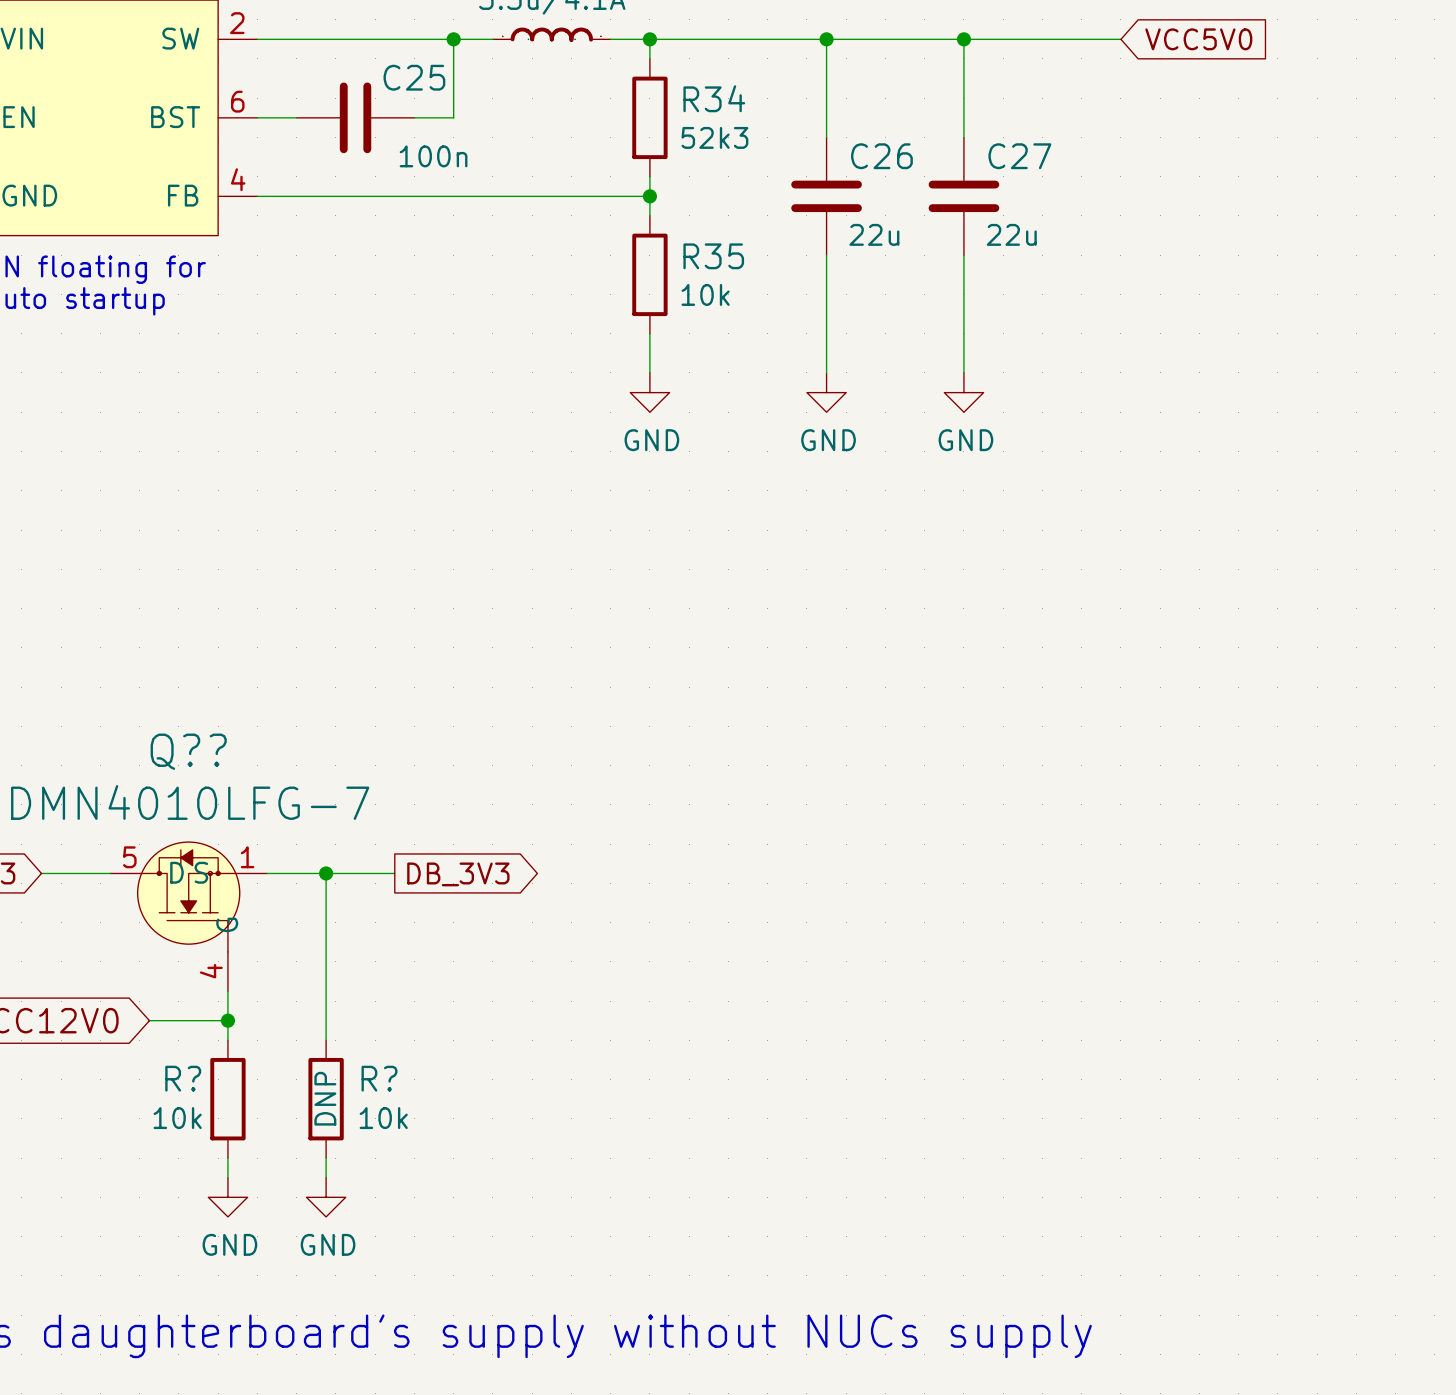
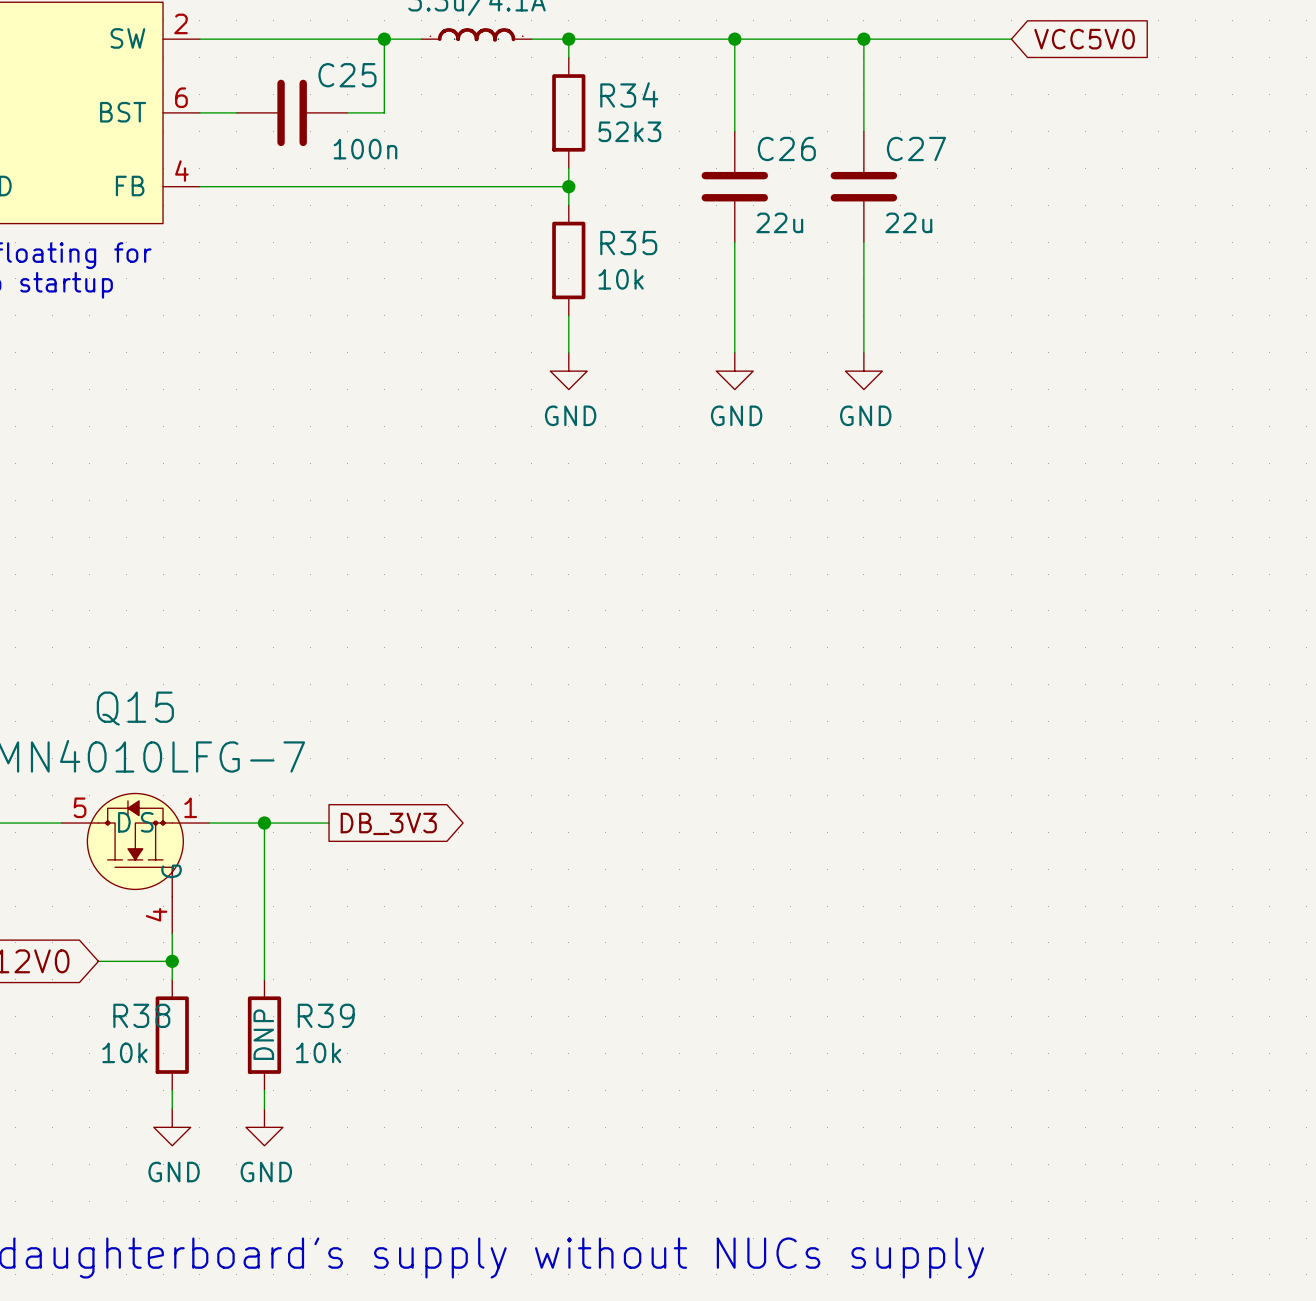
Q?? name: Q?? (188, 751) -> Q15 (135, 708)
R? name: R? (183, 1078) -> R38 (141, 1015)
R? name: R? (379, 1078) -> R39 (326, 1015)

